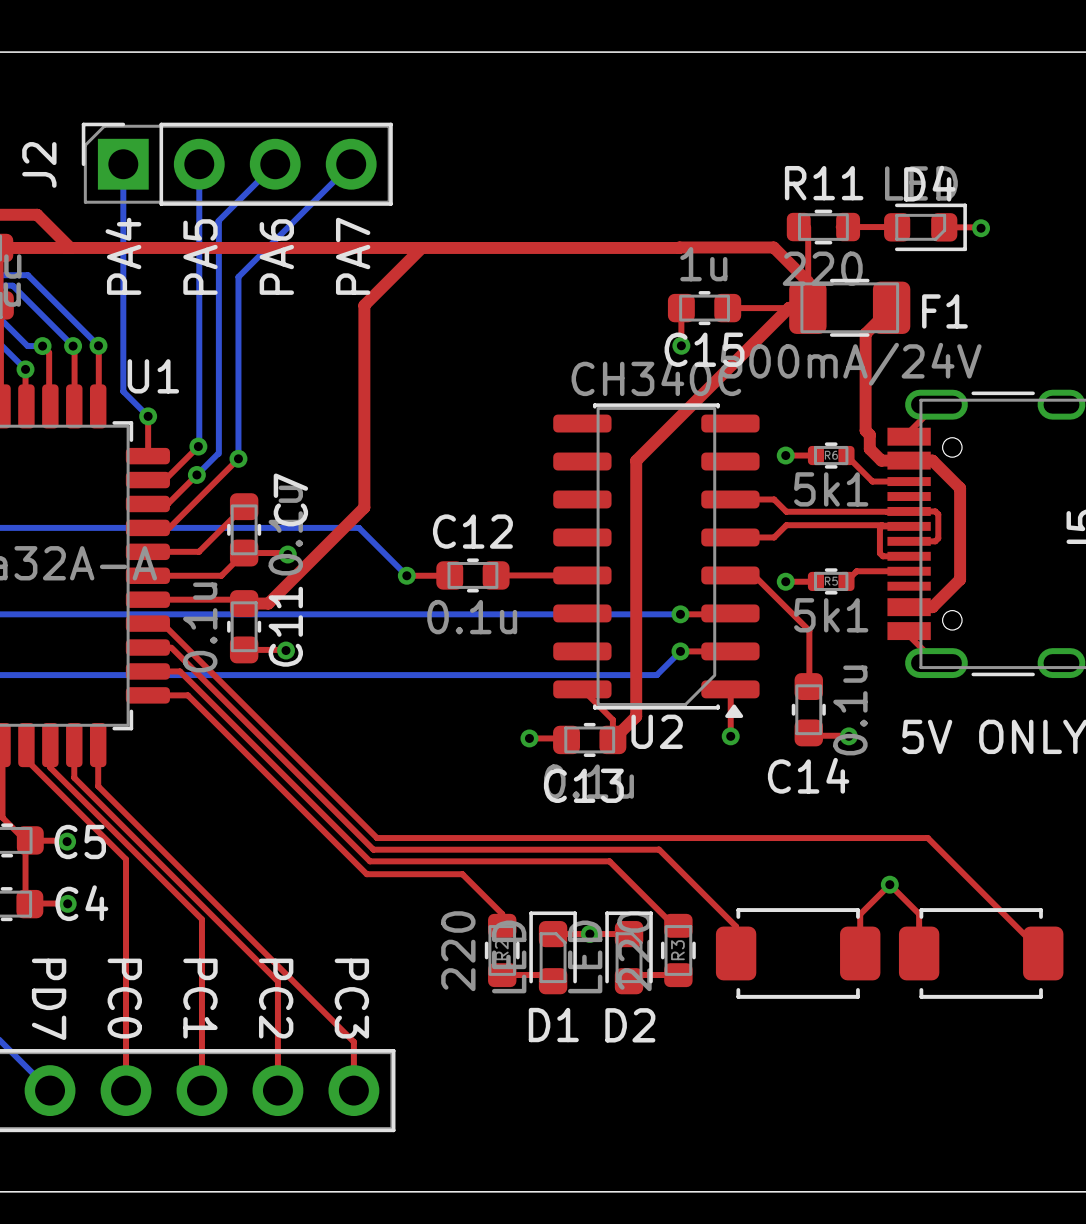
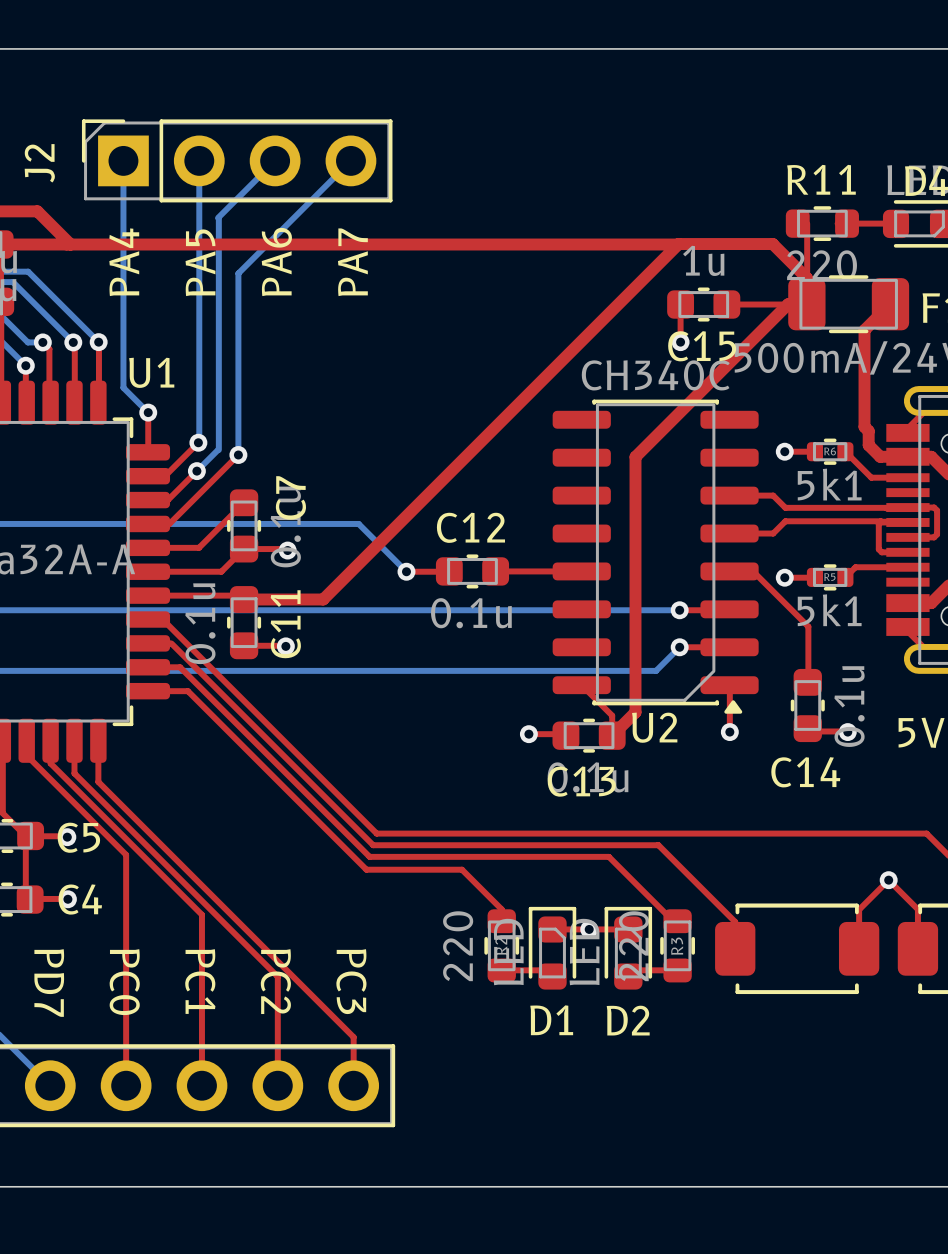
top track: (421, 247) (364, 305) (364, 507) (268, 603) -> (678, 244) (323, 599) (268, 599)

